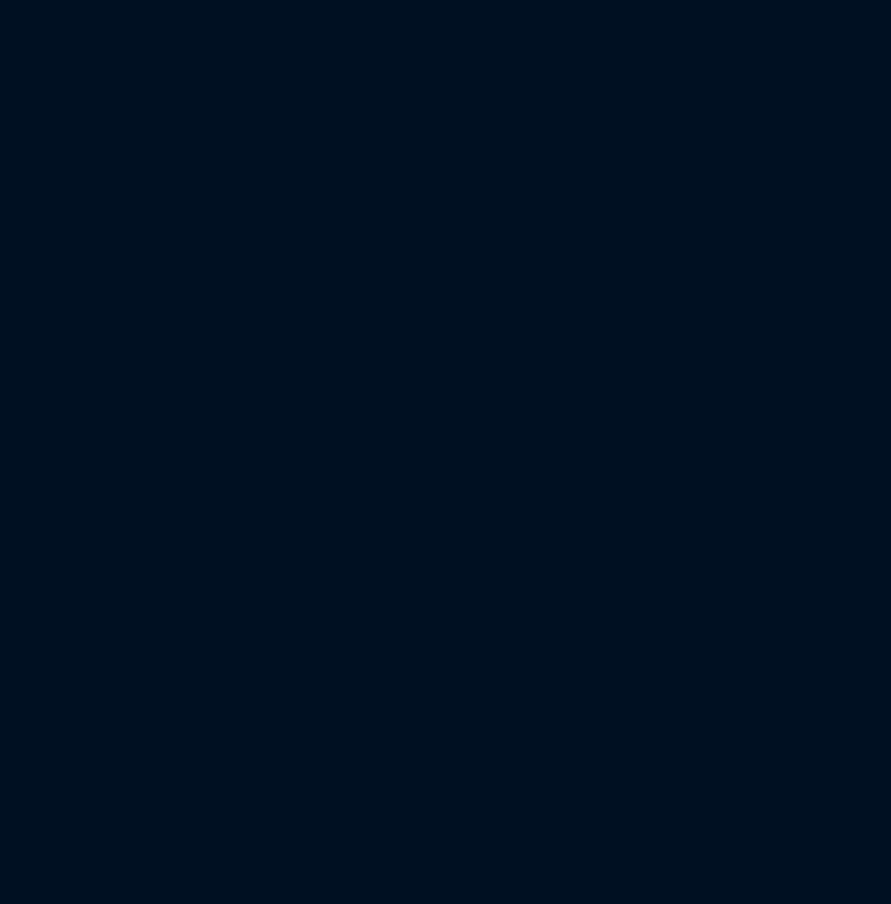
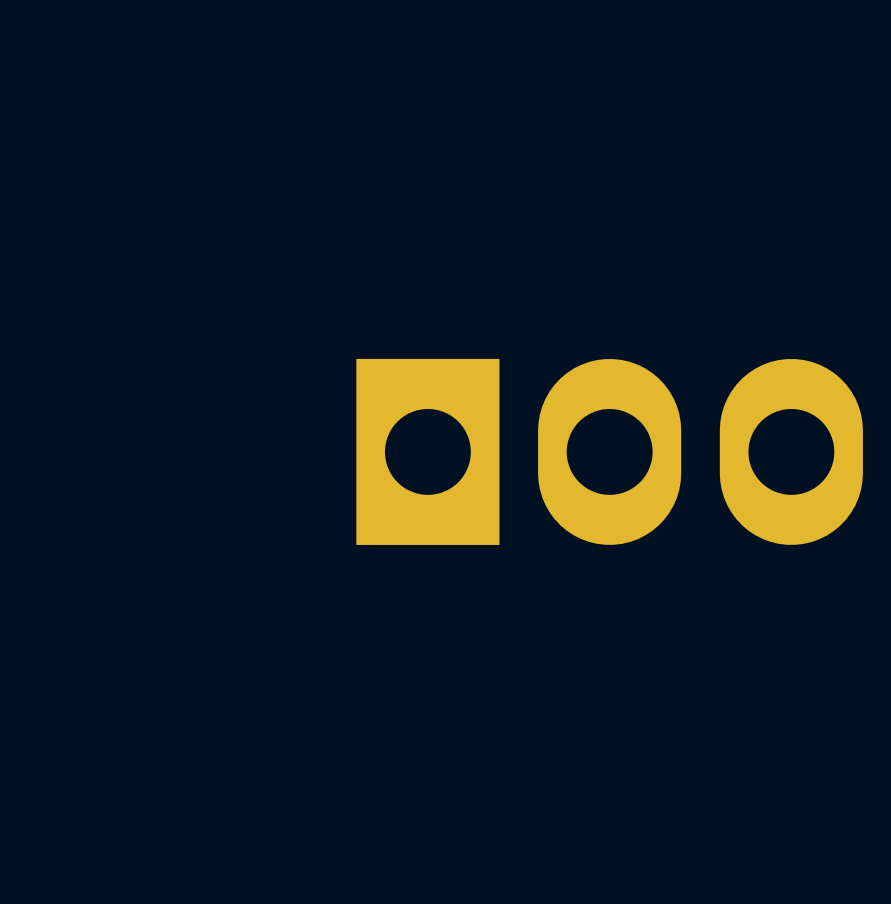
part: none -> (609, 451)

